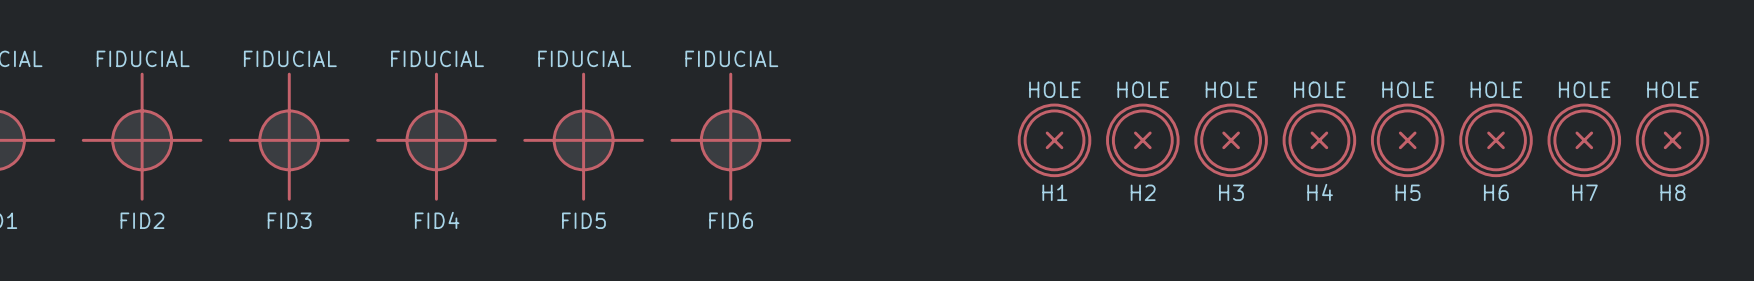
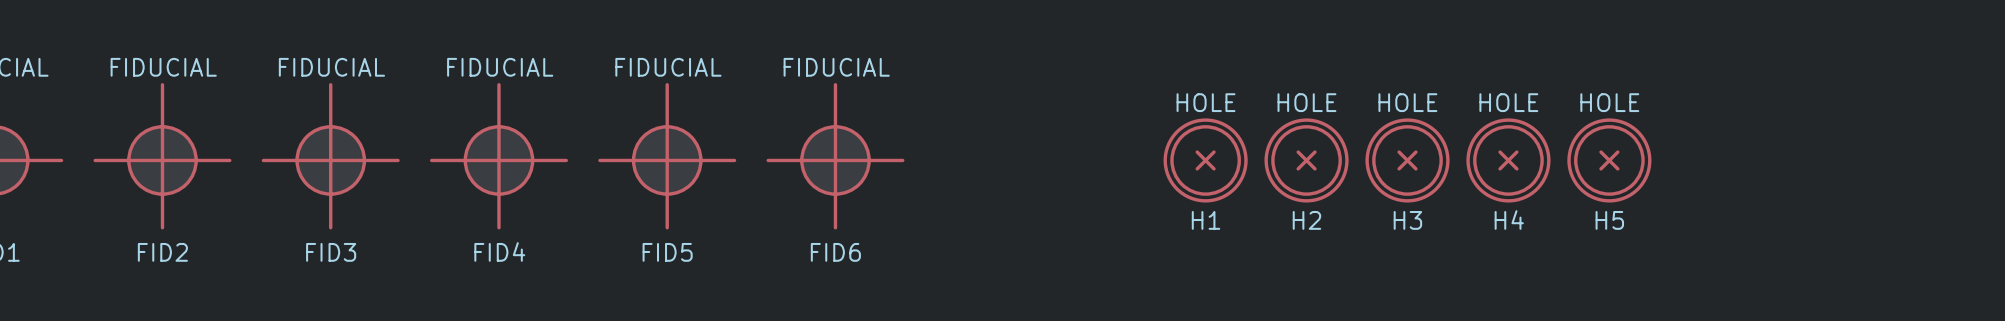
H6: HOLE (1496, 140) -> none
H7: HOLE (1584, 140) -> none
H8: HOLE (1672, 140) -> none

